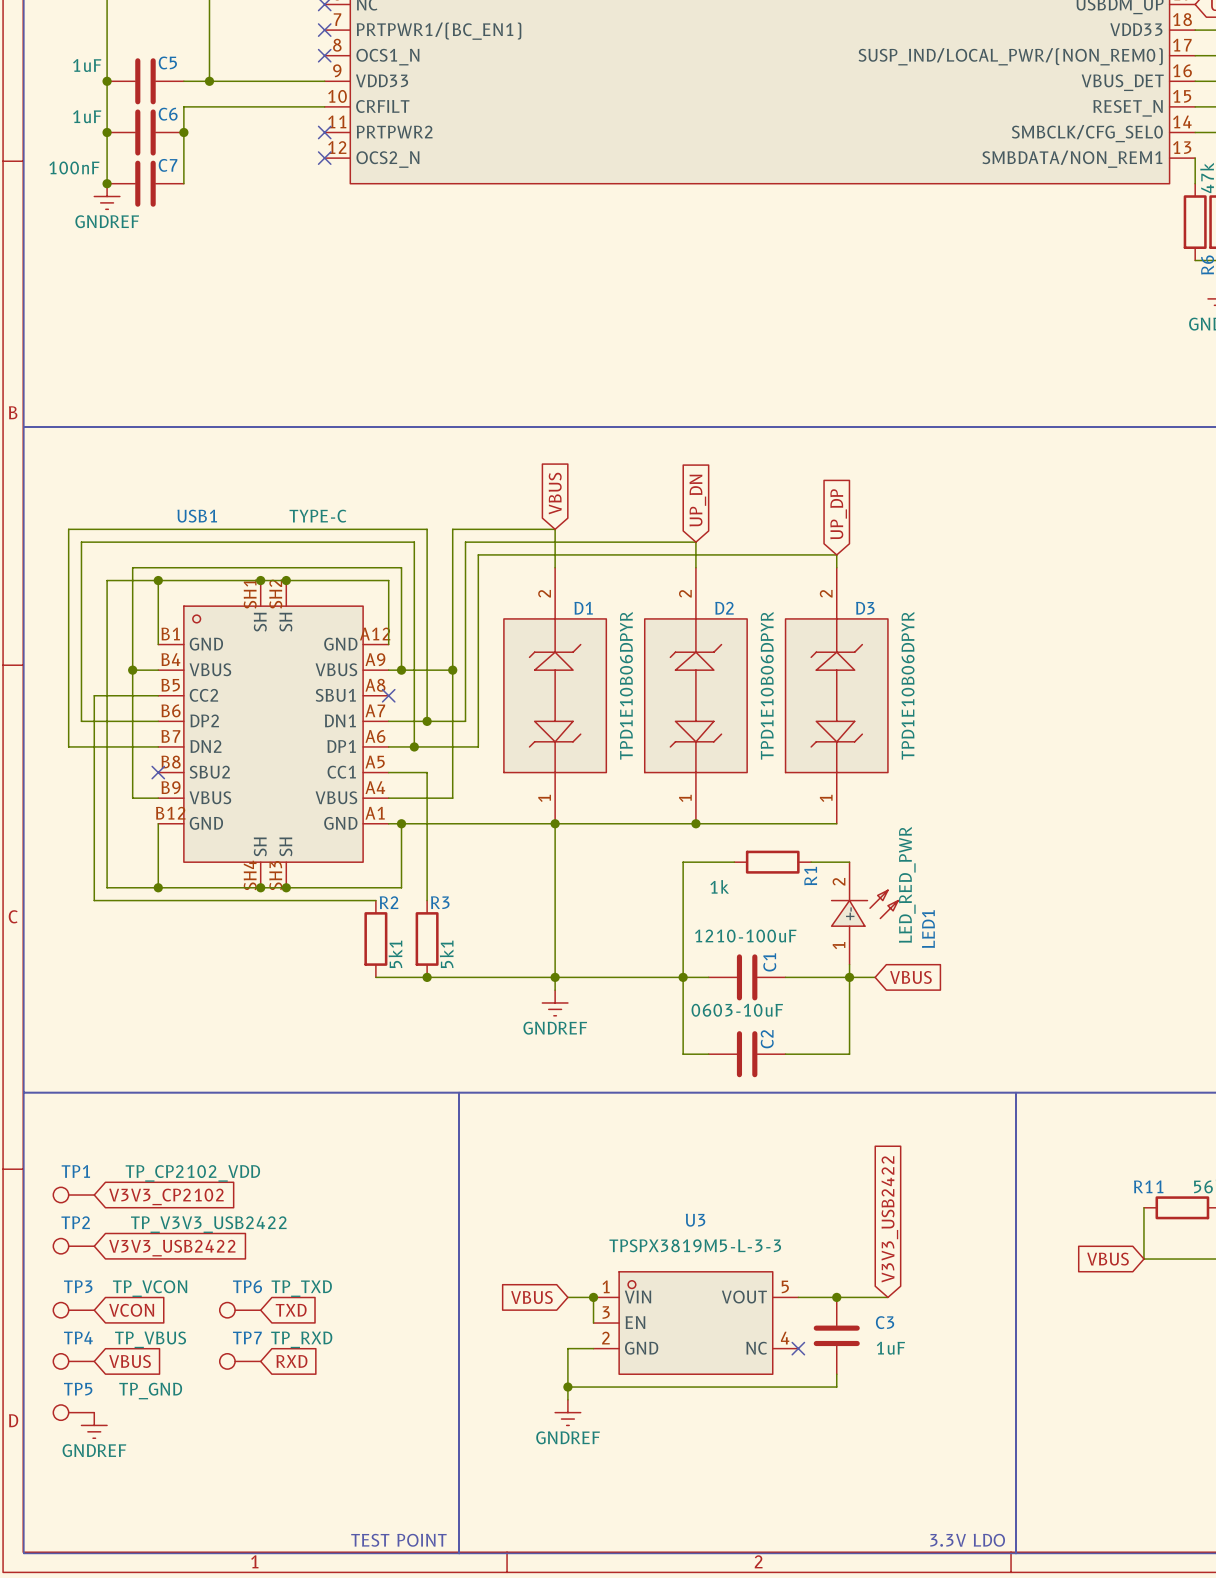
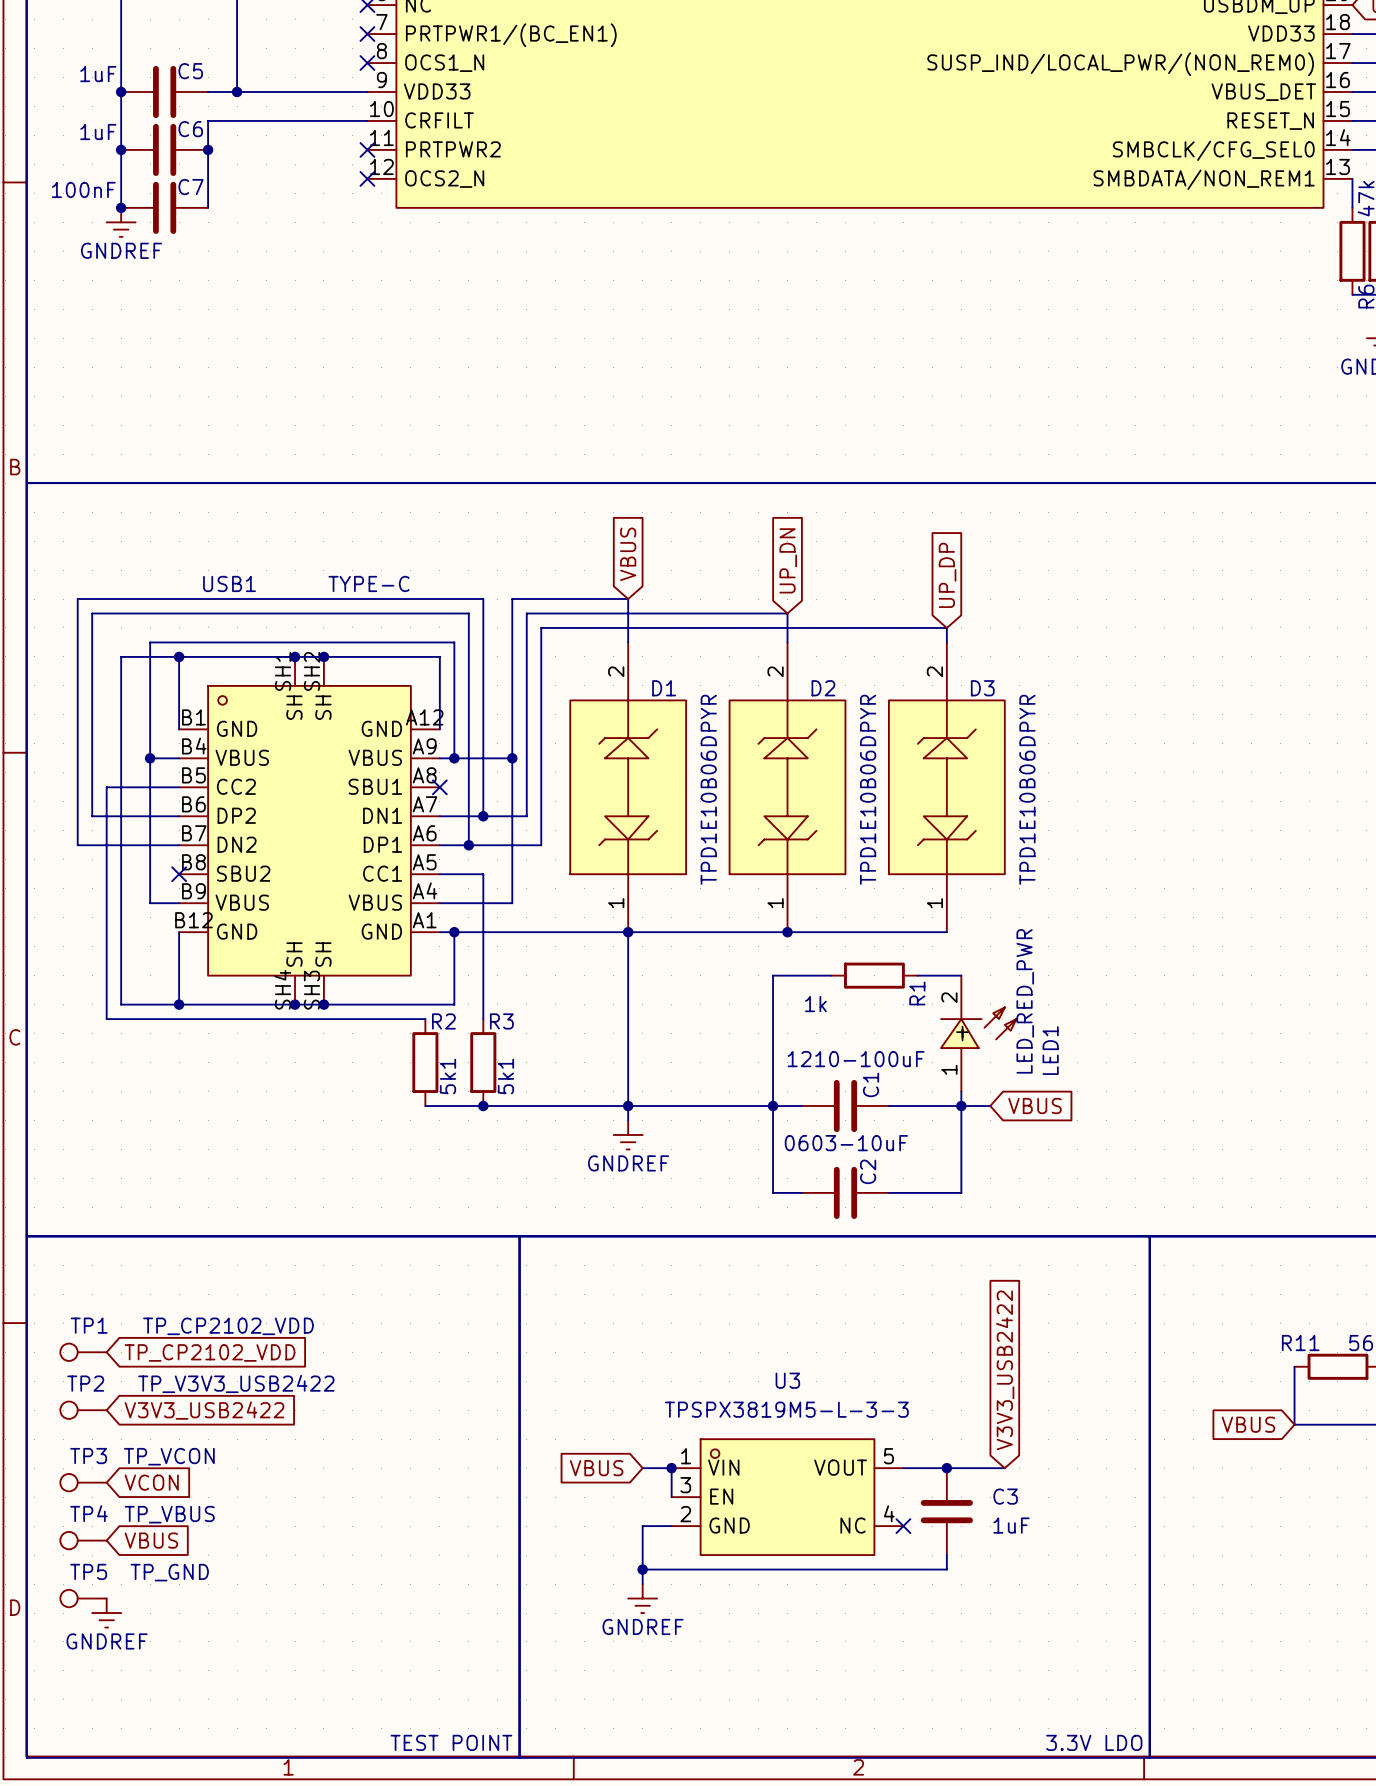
global label: V3V3_CP2102 (166, 1196) -> TP_CP2102_VDD (210, 1352)
TP6: TP_TXD (240, 1310) -> none
global label: TXD (291, 1310) -> none
TP7: TP_RXD (240, 1361) -> none
global label: RXD (291, 1361) -> none

